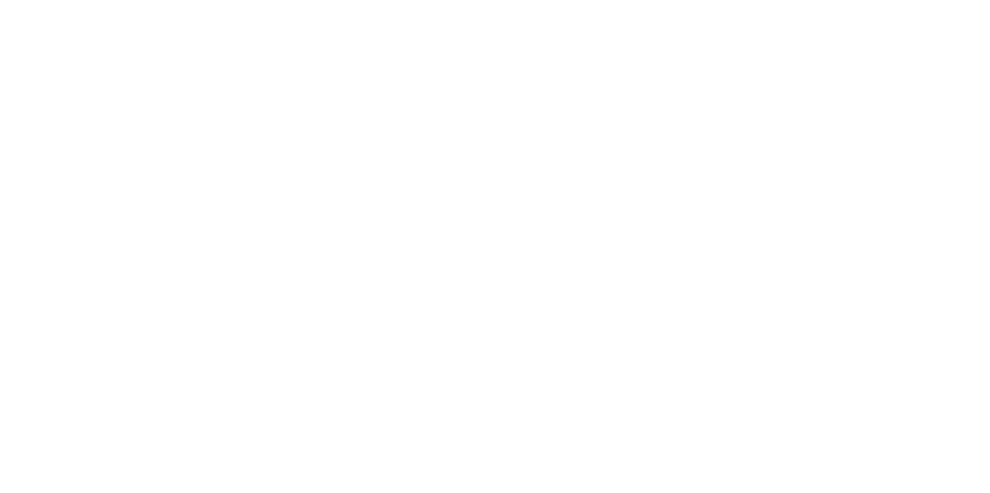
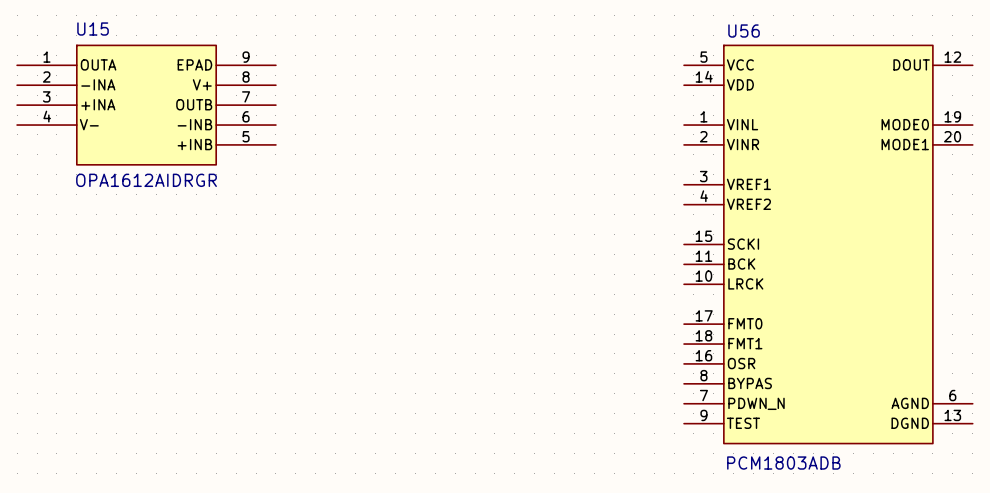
U15: none -> OPA1612AIDRGR (146, 105)
U56: none -> PCM1803ADB (828, 244)

